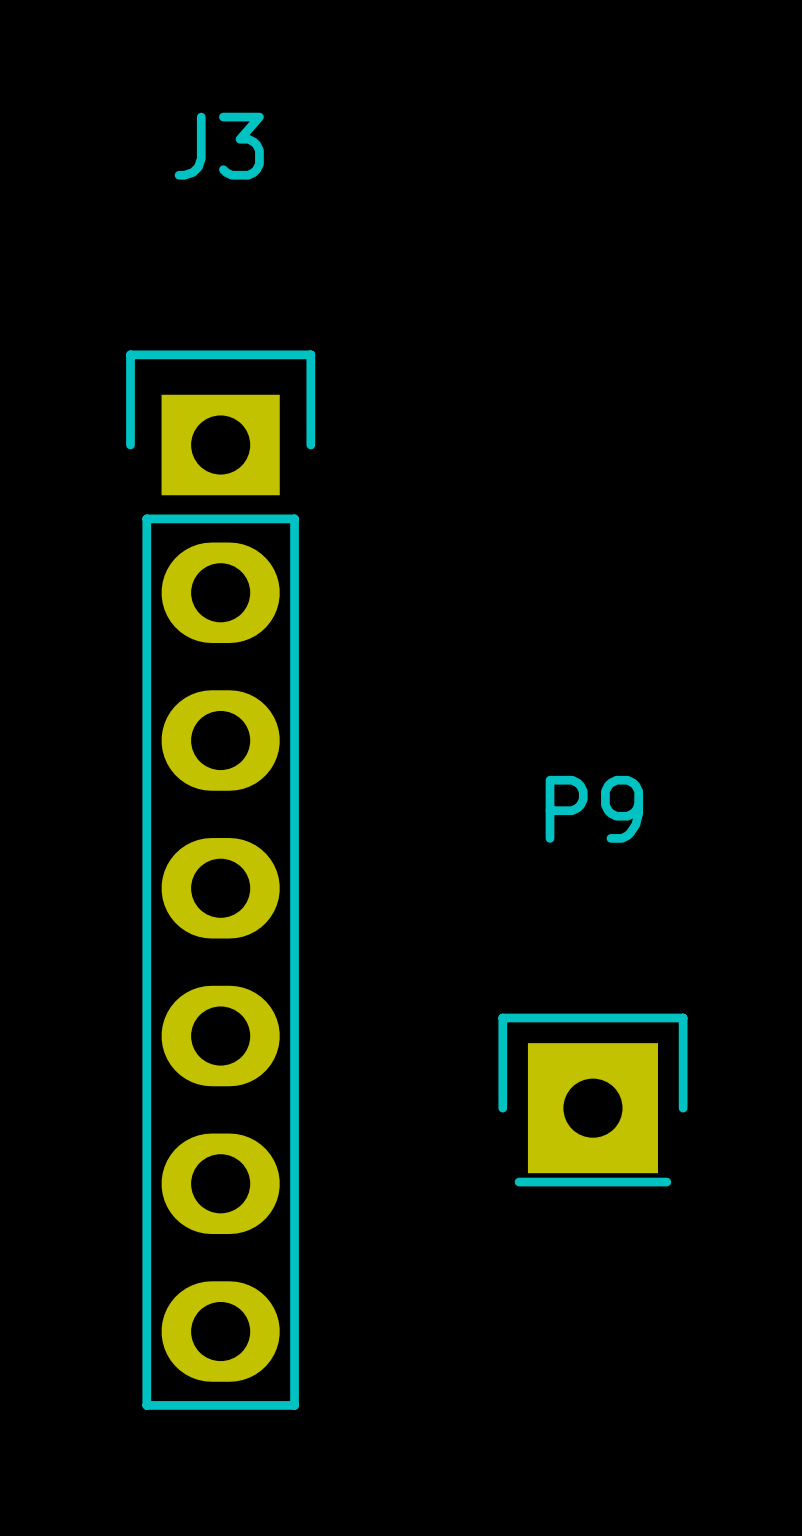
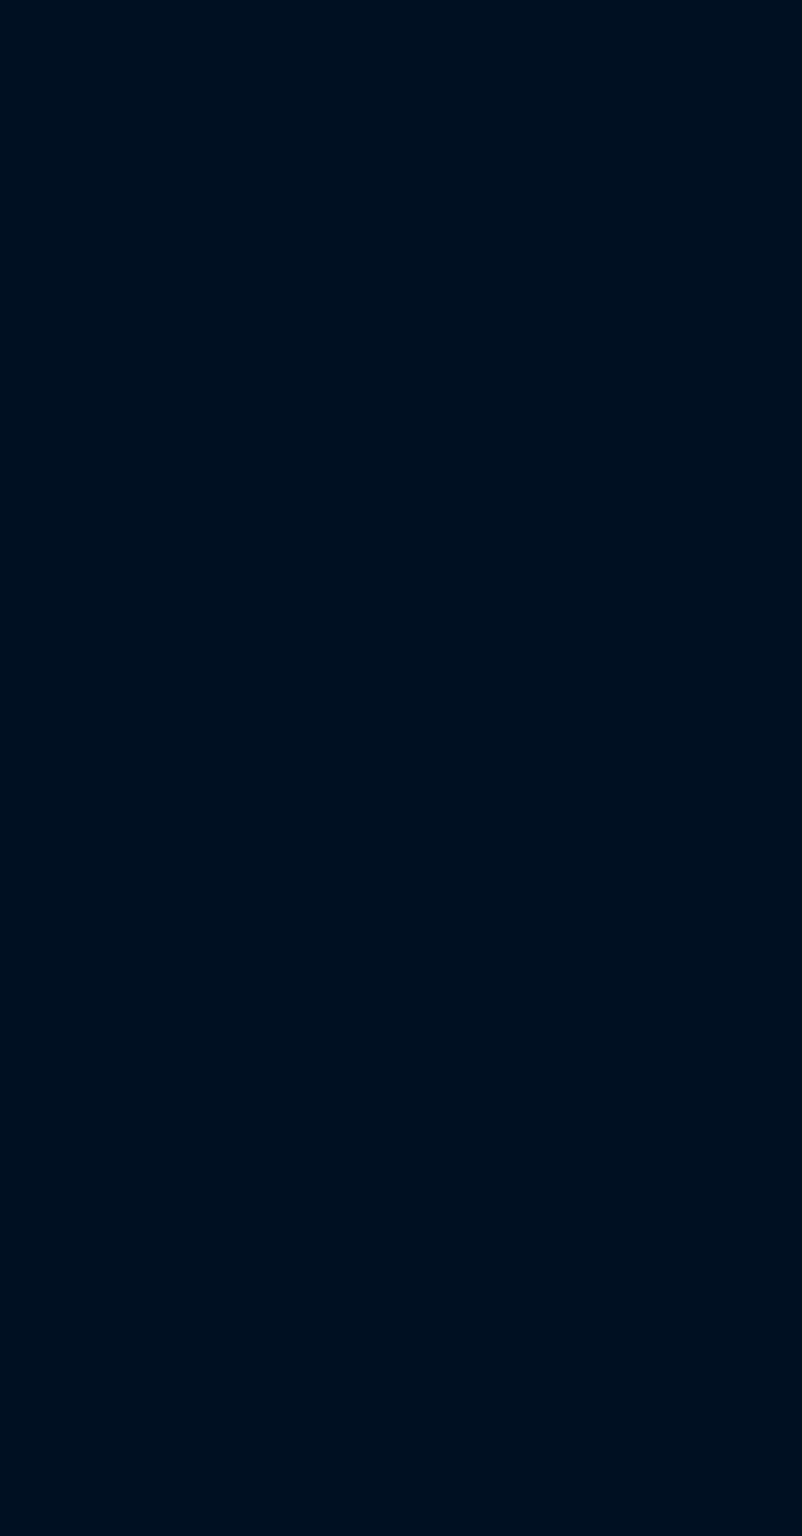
J3: (220, 880) -> none
P9: (592, 1100) -> none

